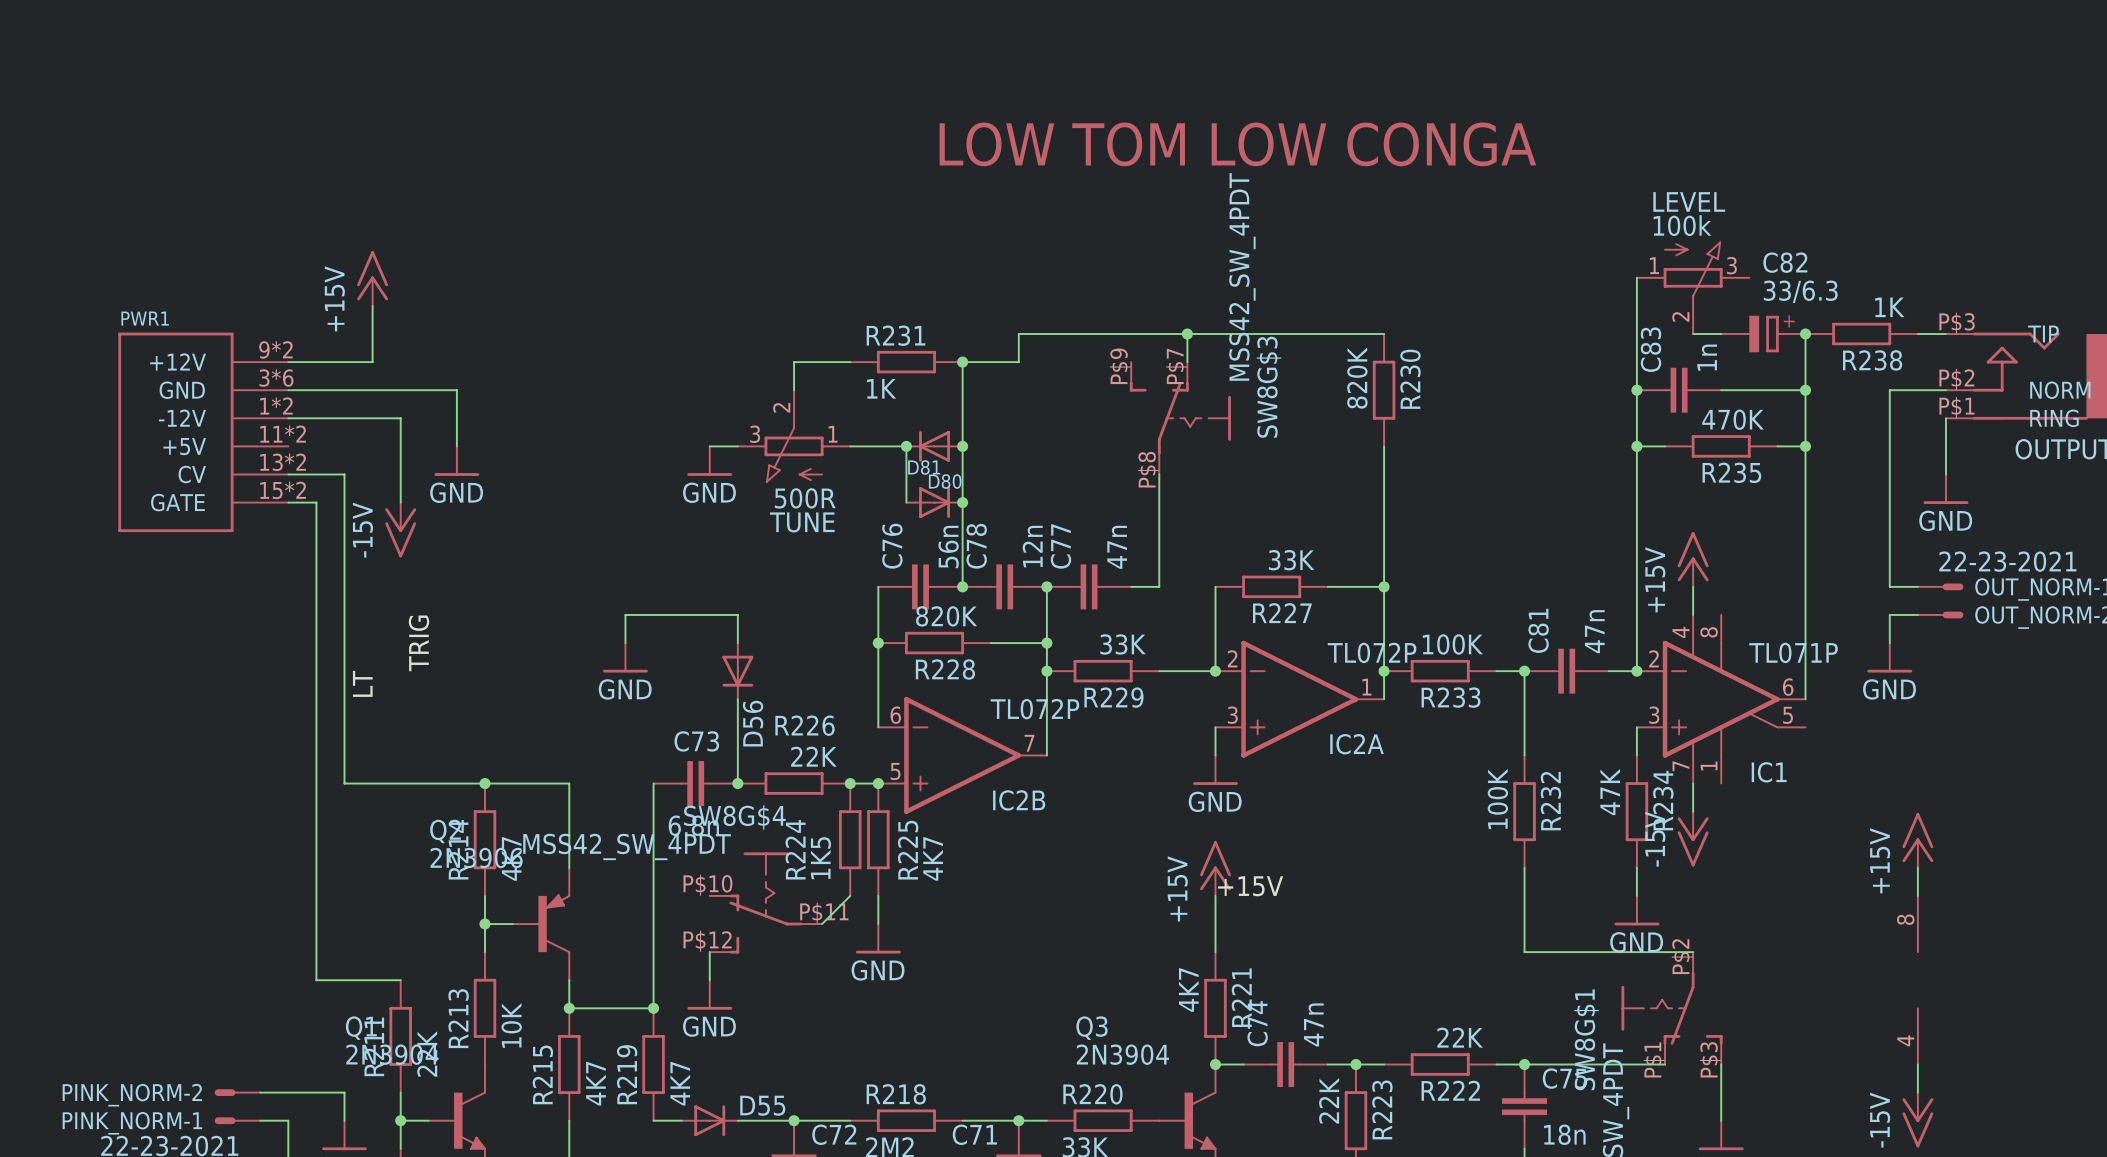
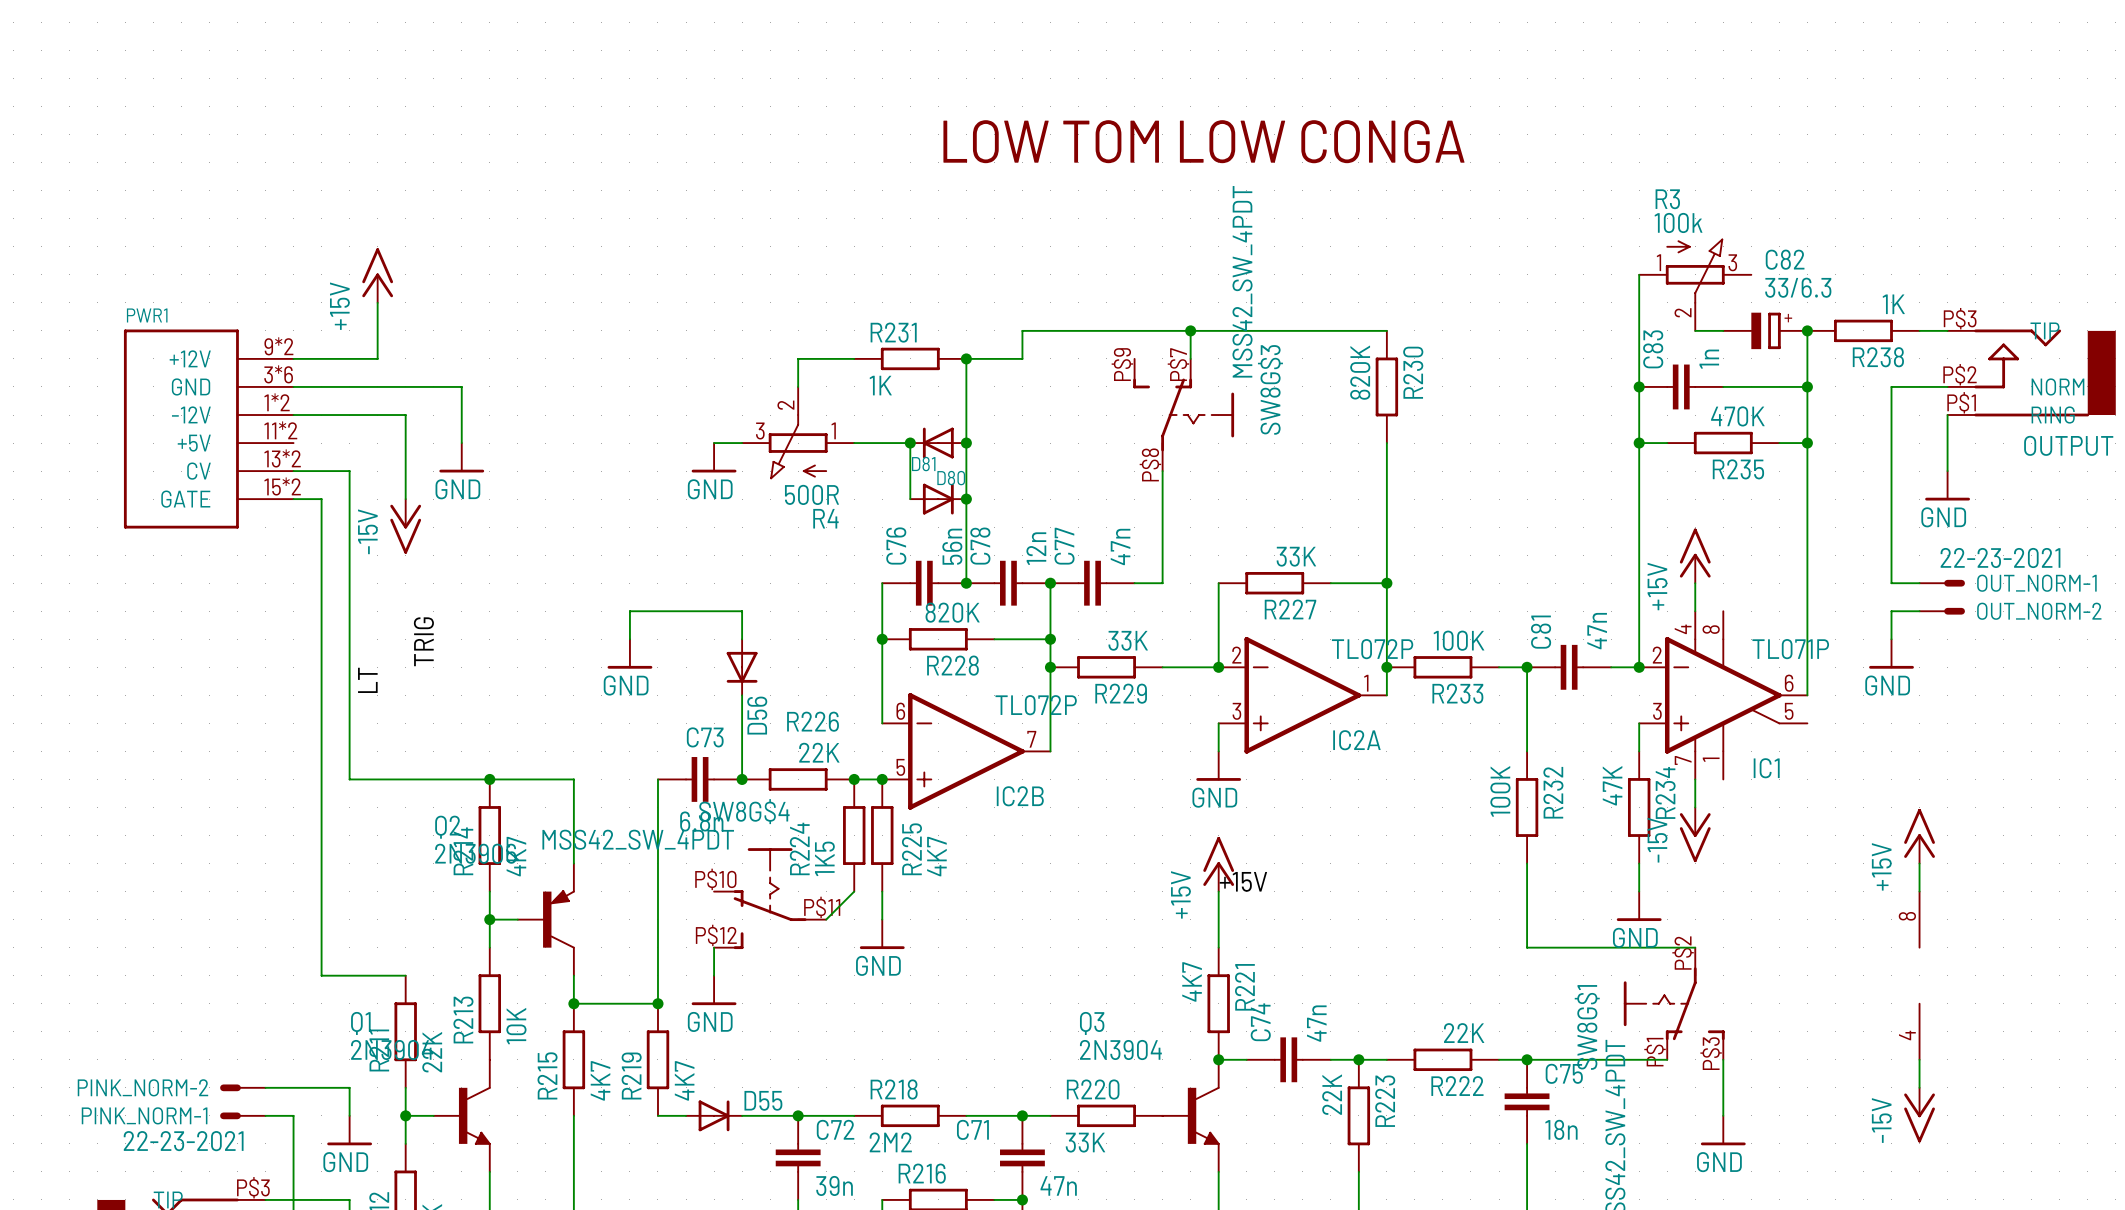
LEVEL name: LEVEL (1689, 201) -> R3 (1667, 199)
TUNE name: TUNE (802, 522) -> R4 (825, 518)

